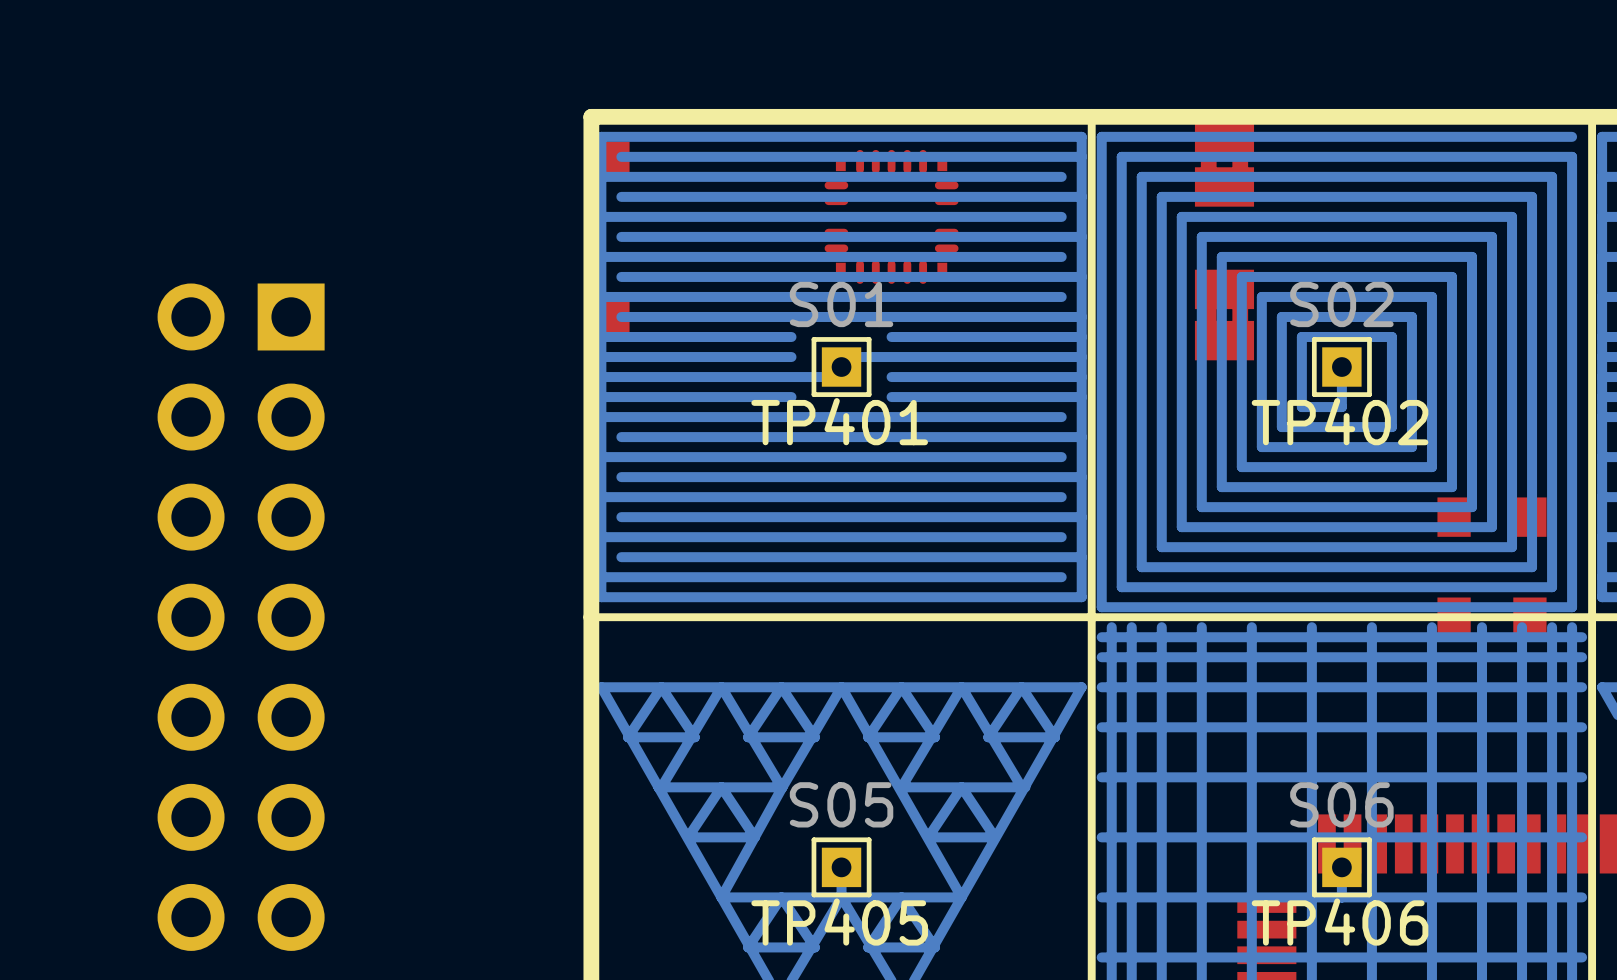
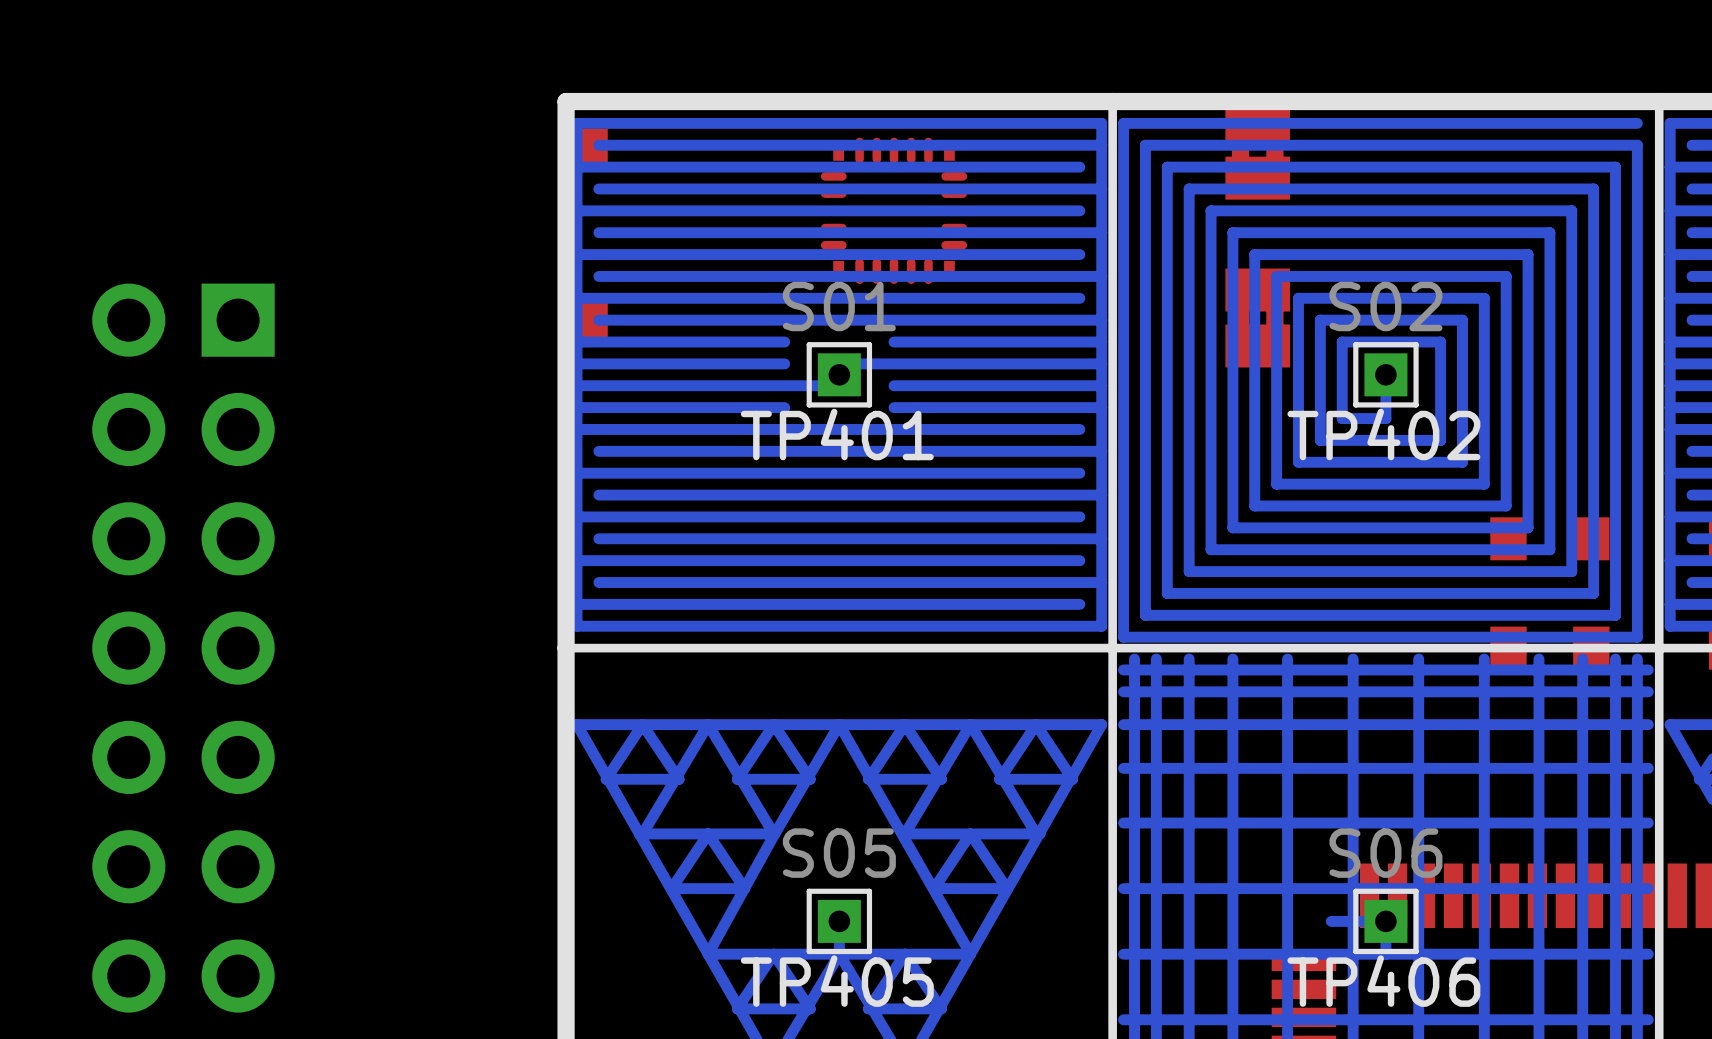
bottom track: none -> (1385, 921) (1331, 921)

